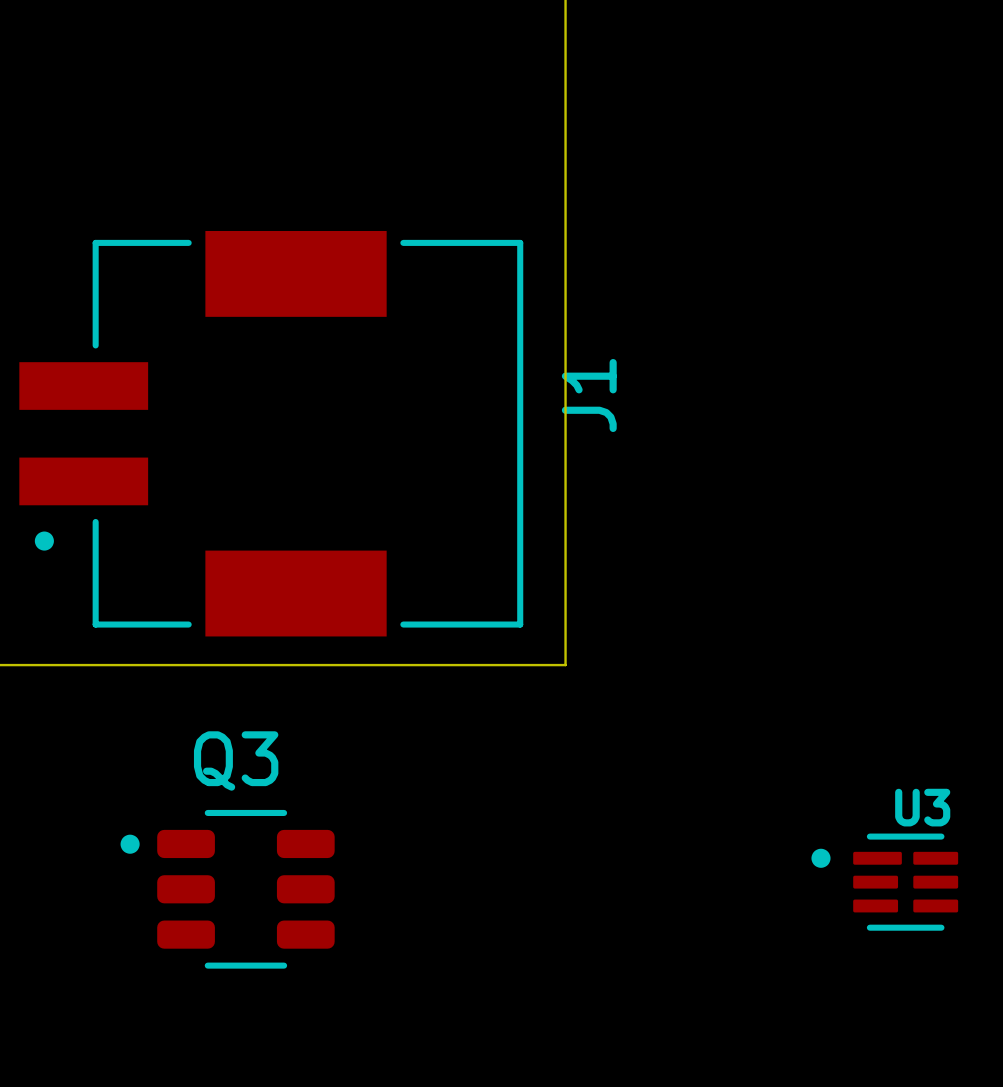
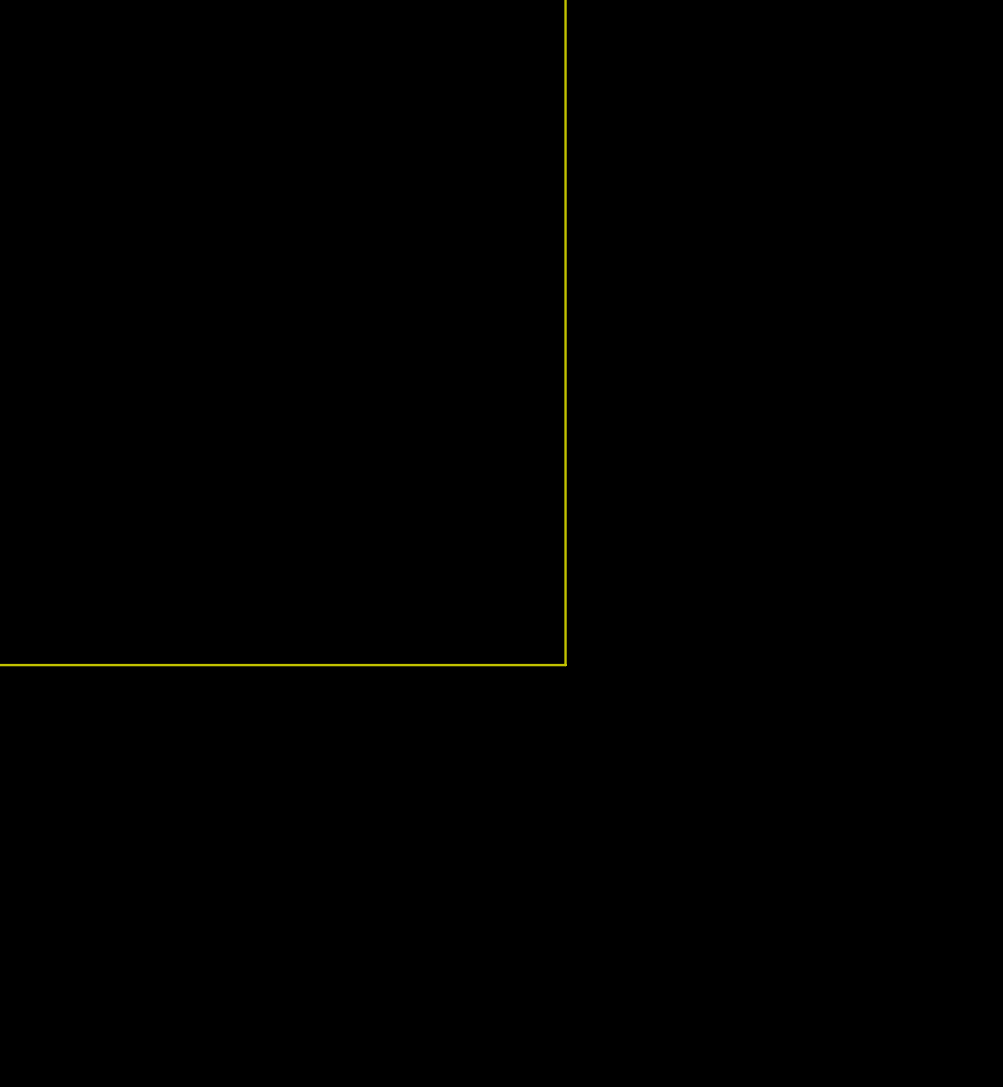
J1: (271, 433) -> none
U3: (884, 882) -> none
Q3: (227, 889) -> none

